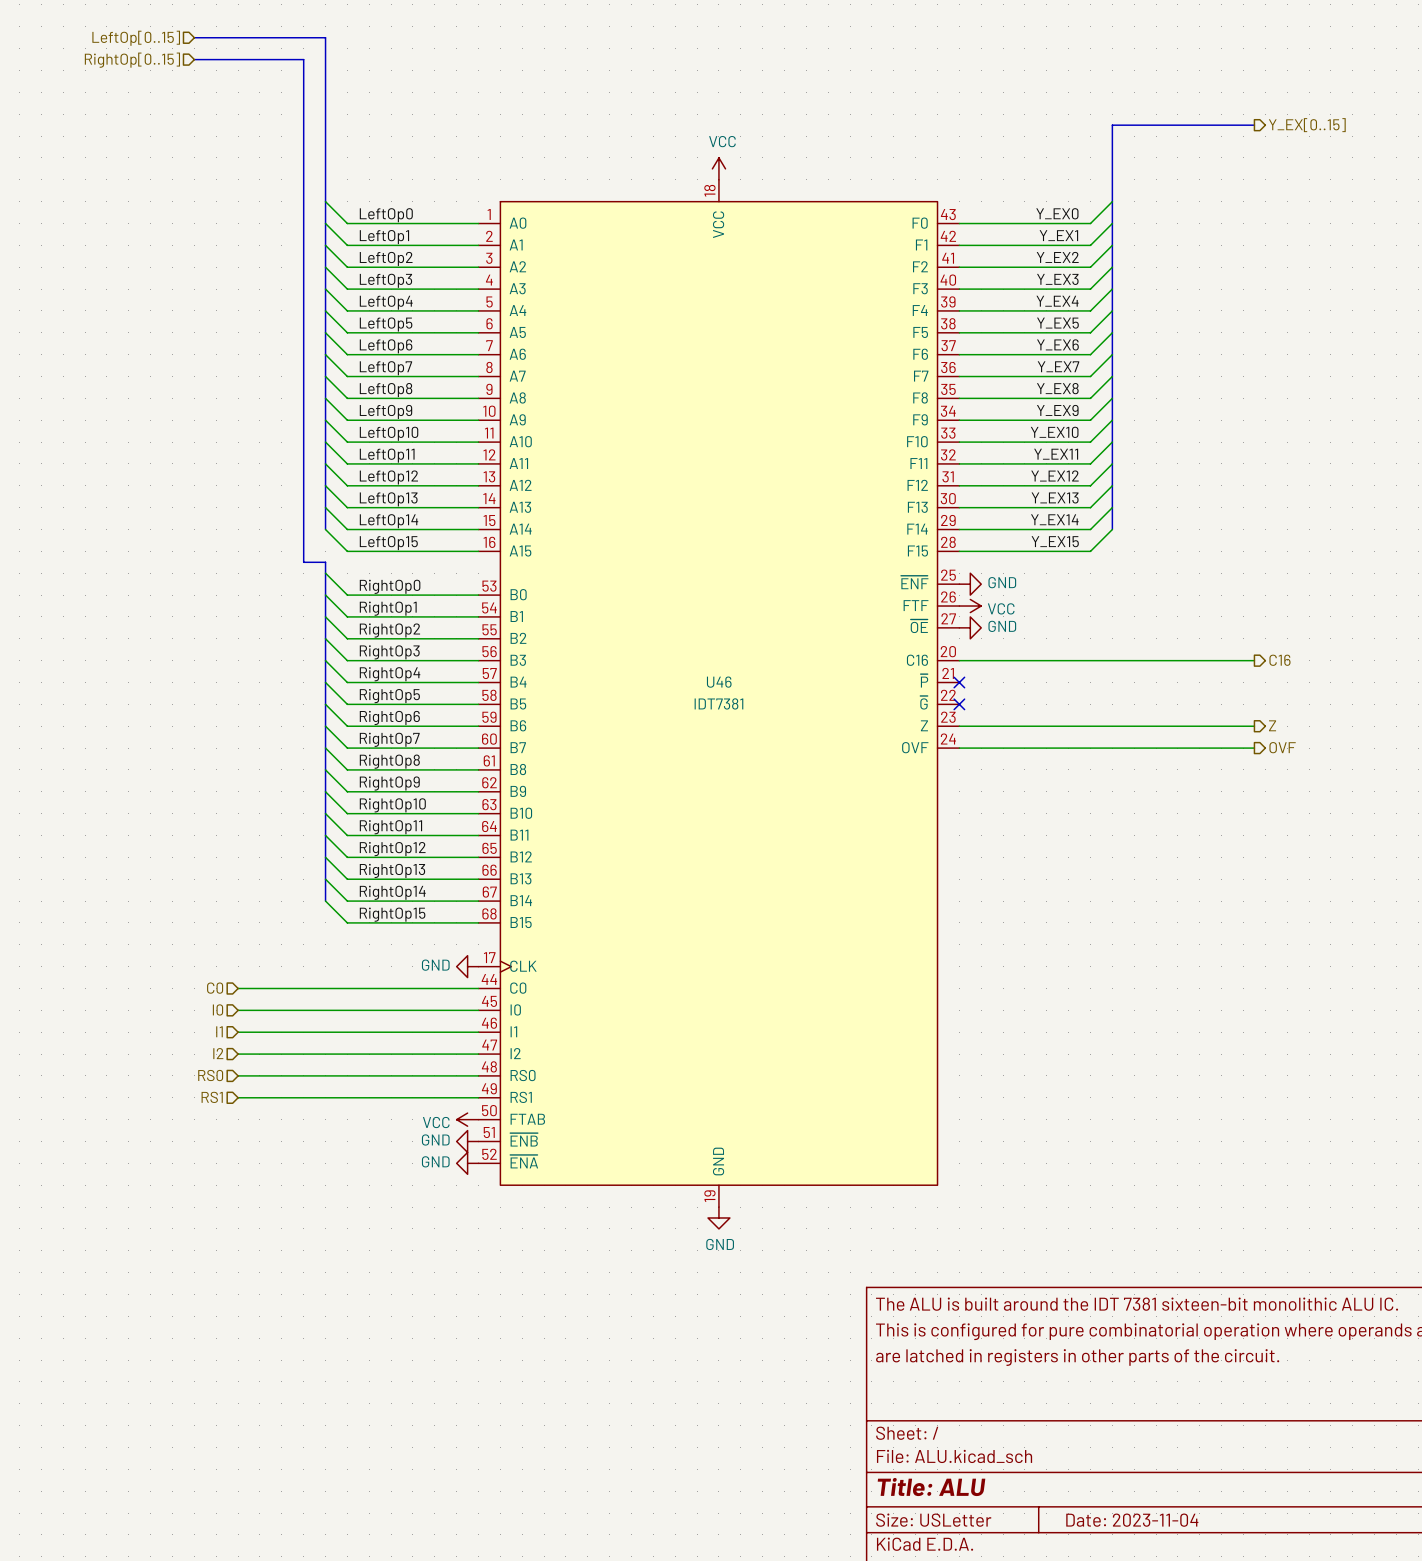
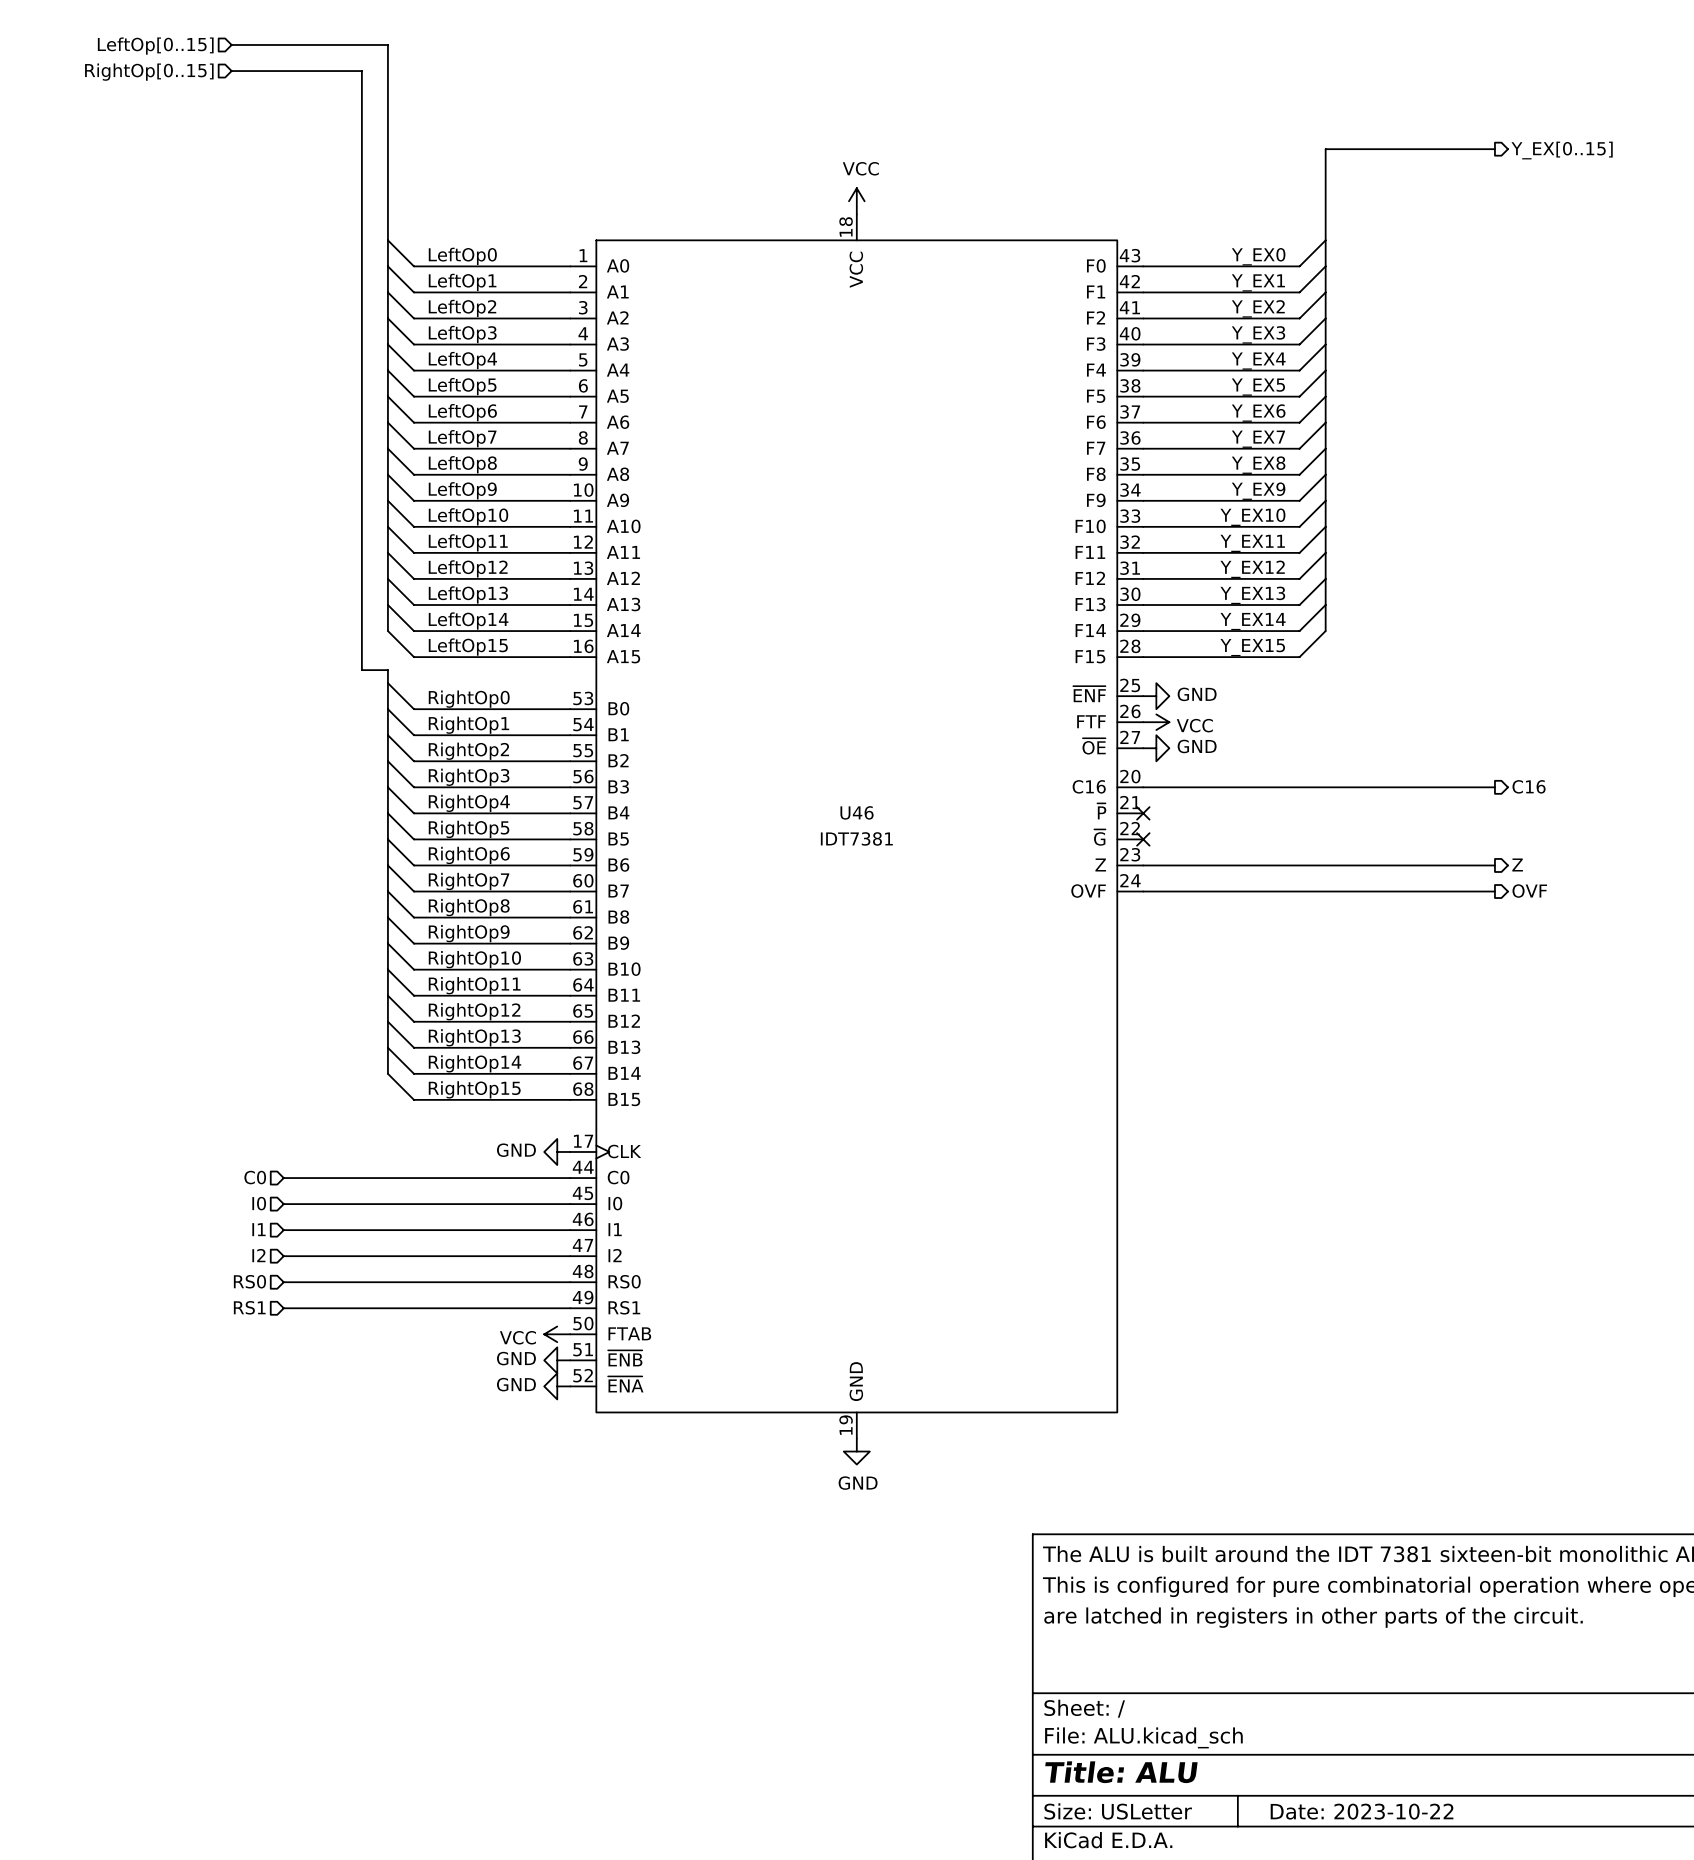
title block: Date: 2023-11-04 (1132, 1520) -> Date: 2023-10-22 (1362, 1811)

